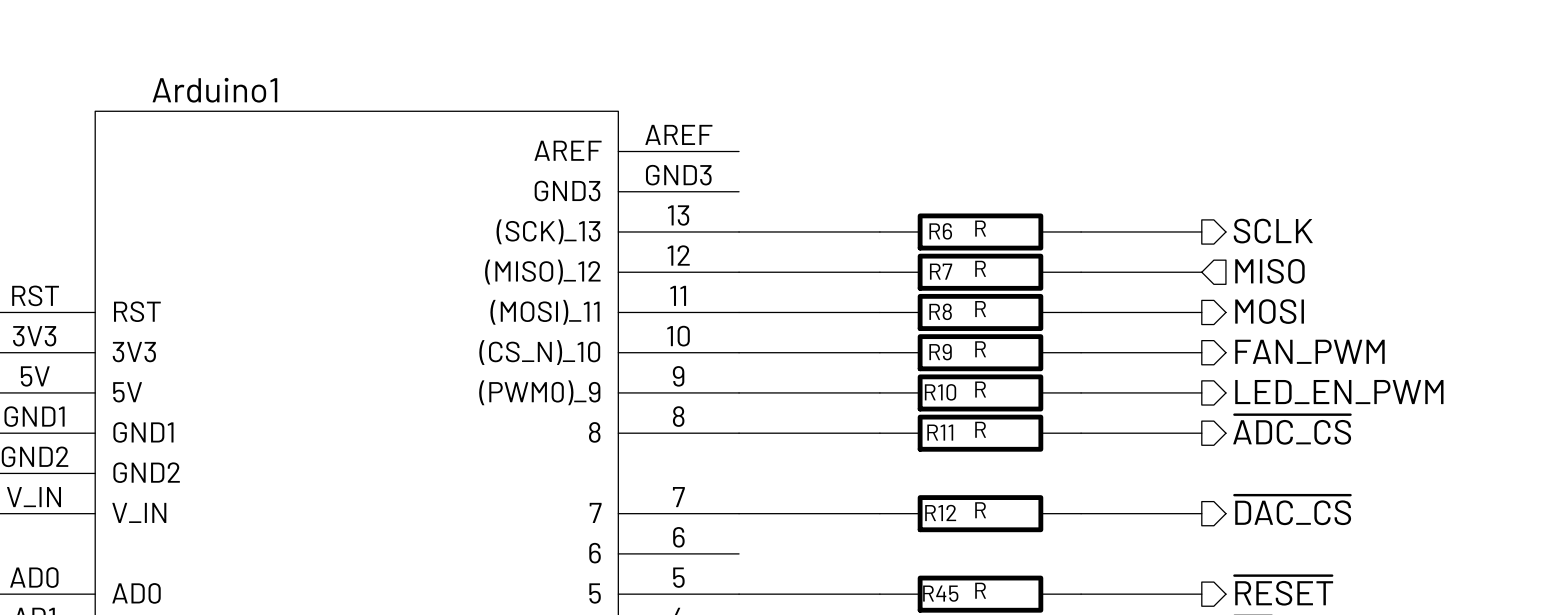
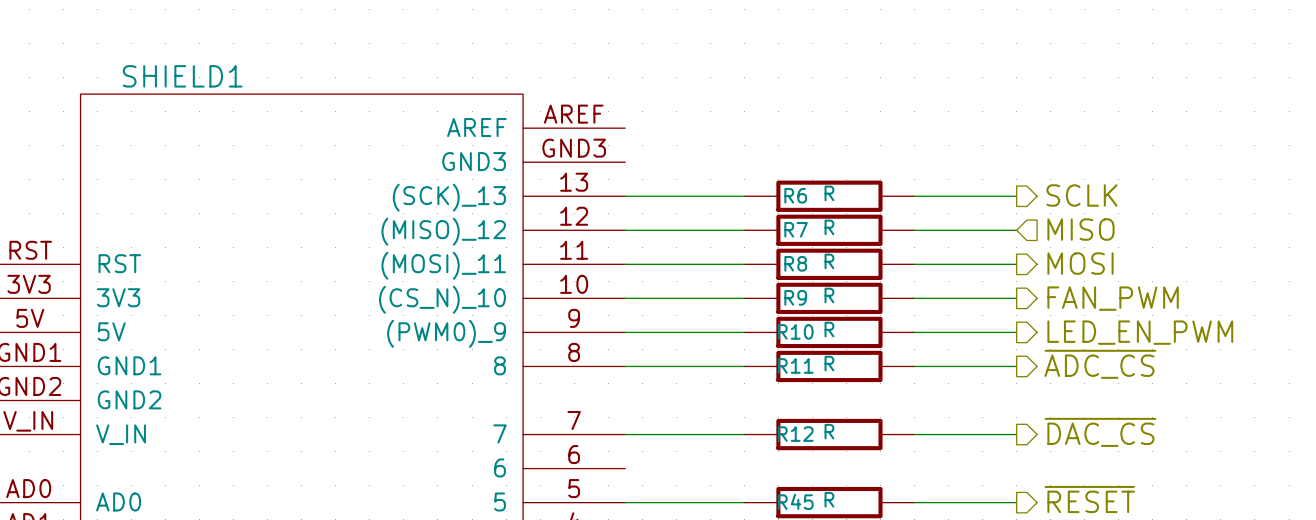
Arduino1 name: Arduino1 (214, 90) -> SHIELD1 (182, 76)

